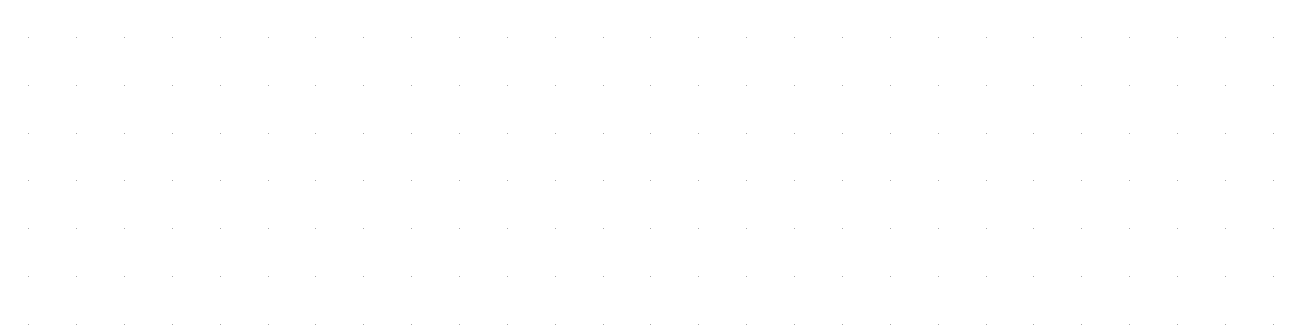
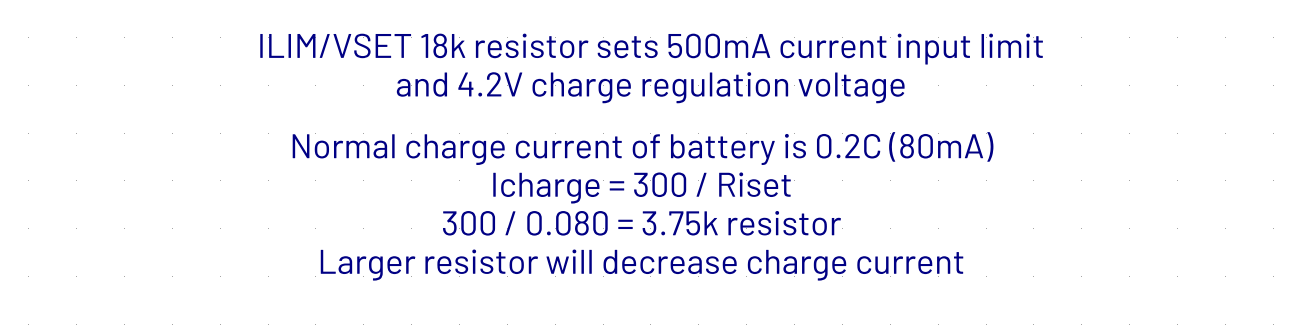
text: none -> ILIM/VSET 18k resistor sets 500mA current input limit (651, 49)
text: none -> and 4.2V charge regulation voltage (650, 87)
text: none -> Normal charge current of battery is 0.2C (80mA) (643, 148)
text: none -> Icharge = 300 / Riset (642, 187)
text: none -> 300 / 0.080 = 3.75k resistor (641, 223)
text: none -> Larger resistor will decrease charge current (642, 265)

